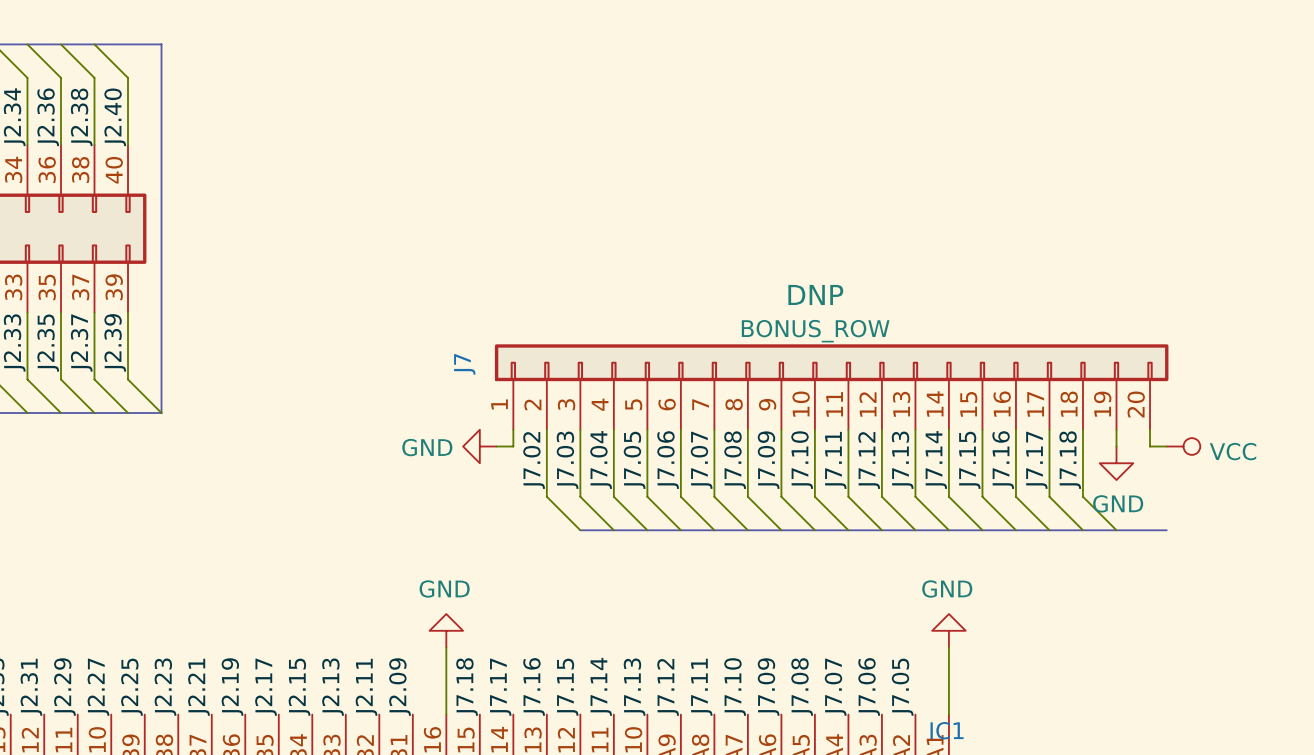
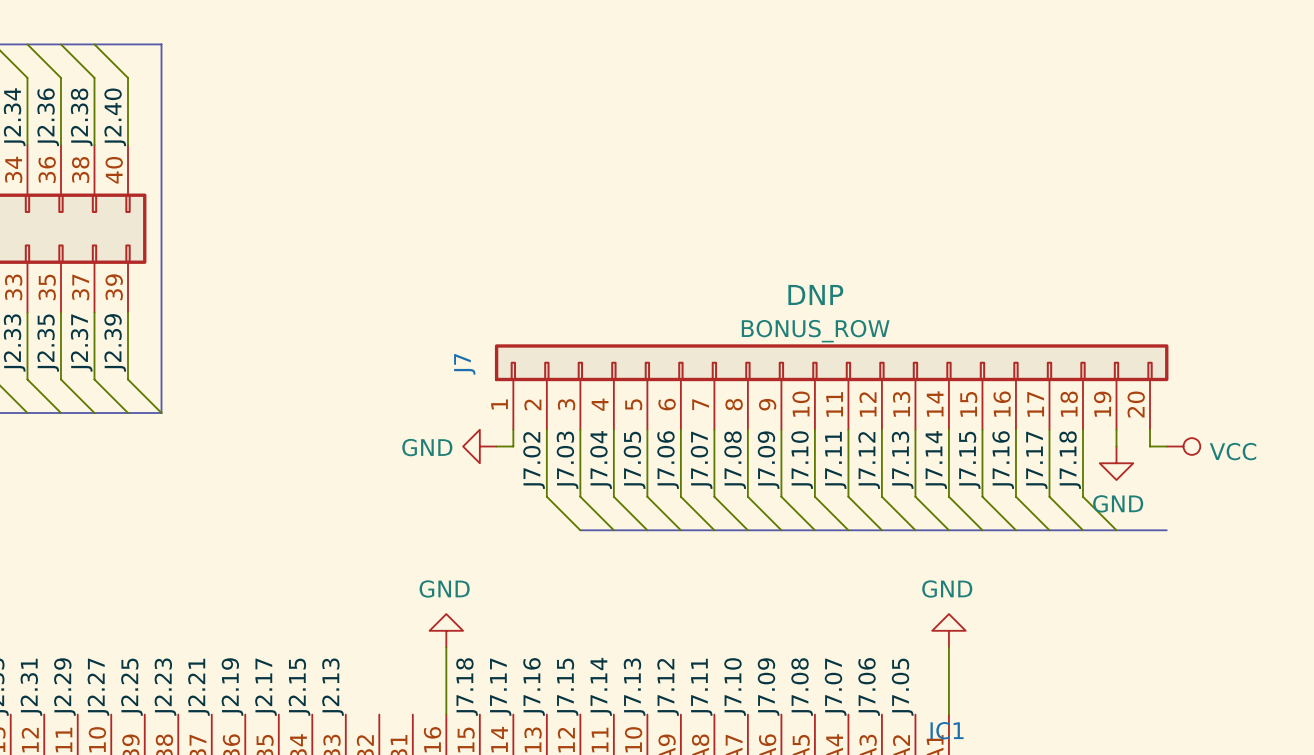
label: J2.11 (366, 687) -> none
label: J2.09 (400, 687) -> none

